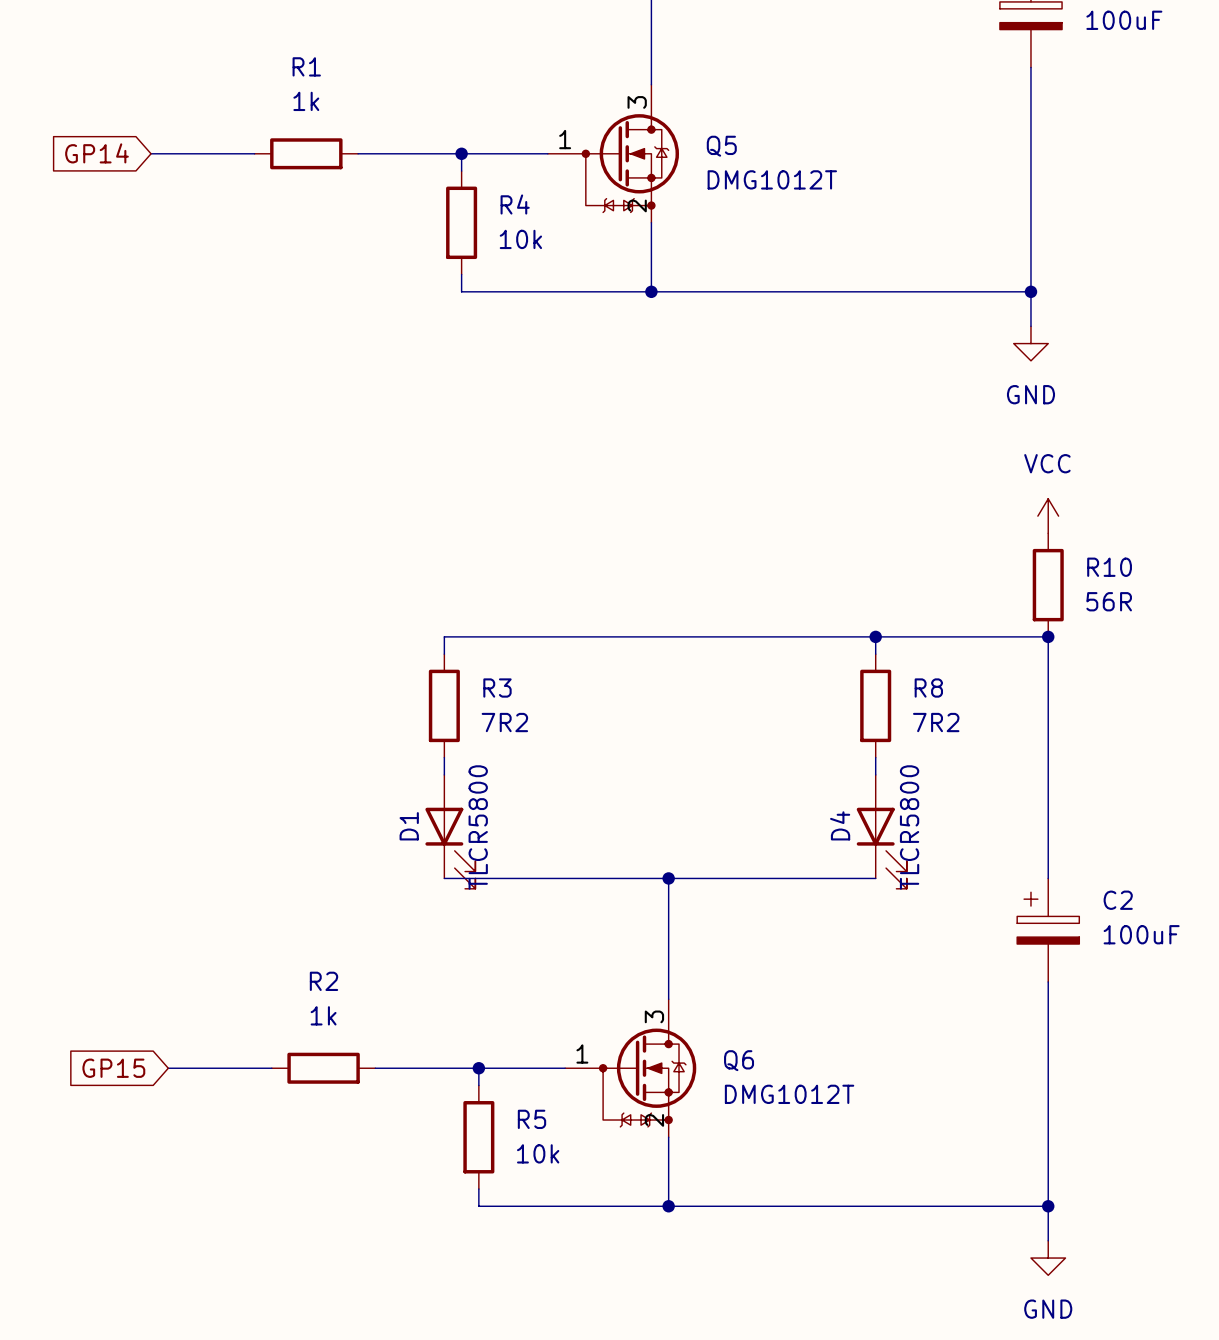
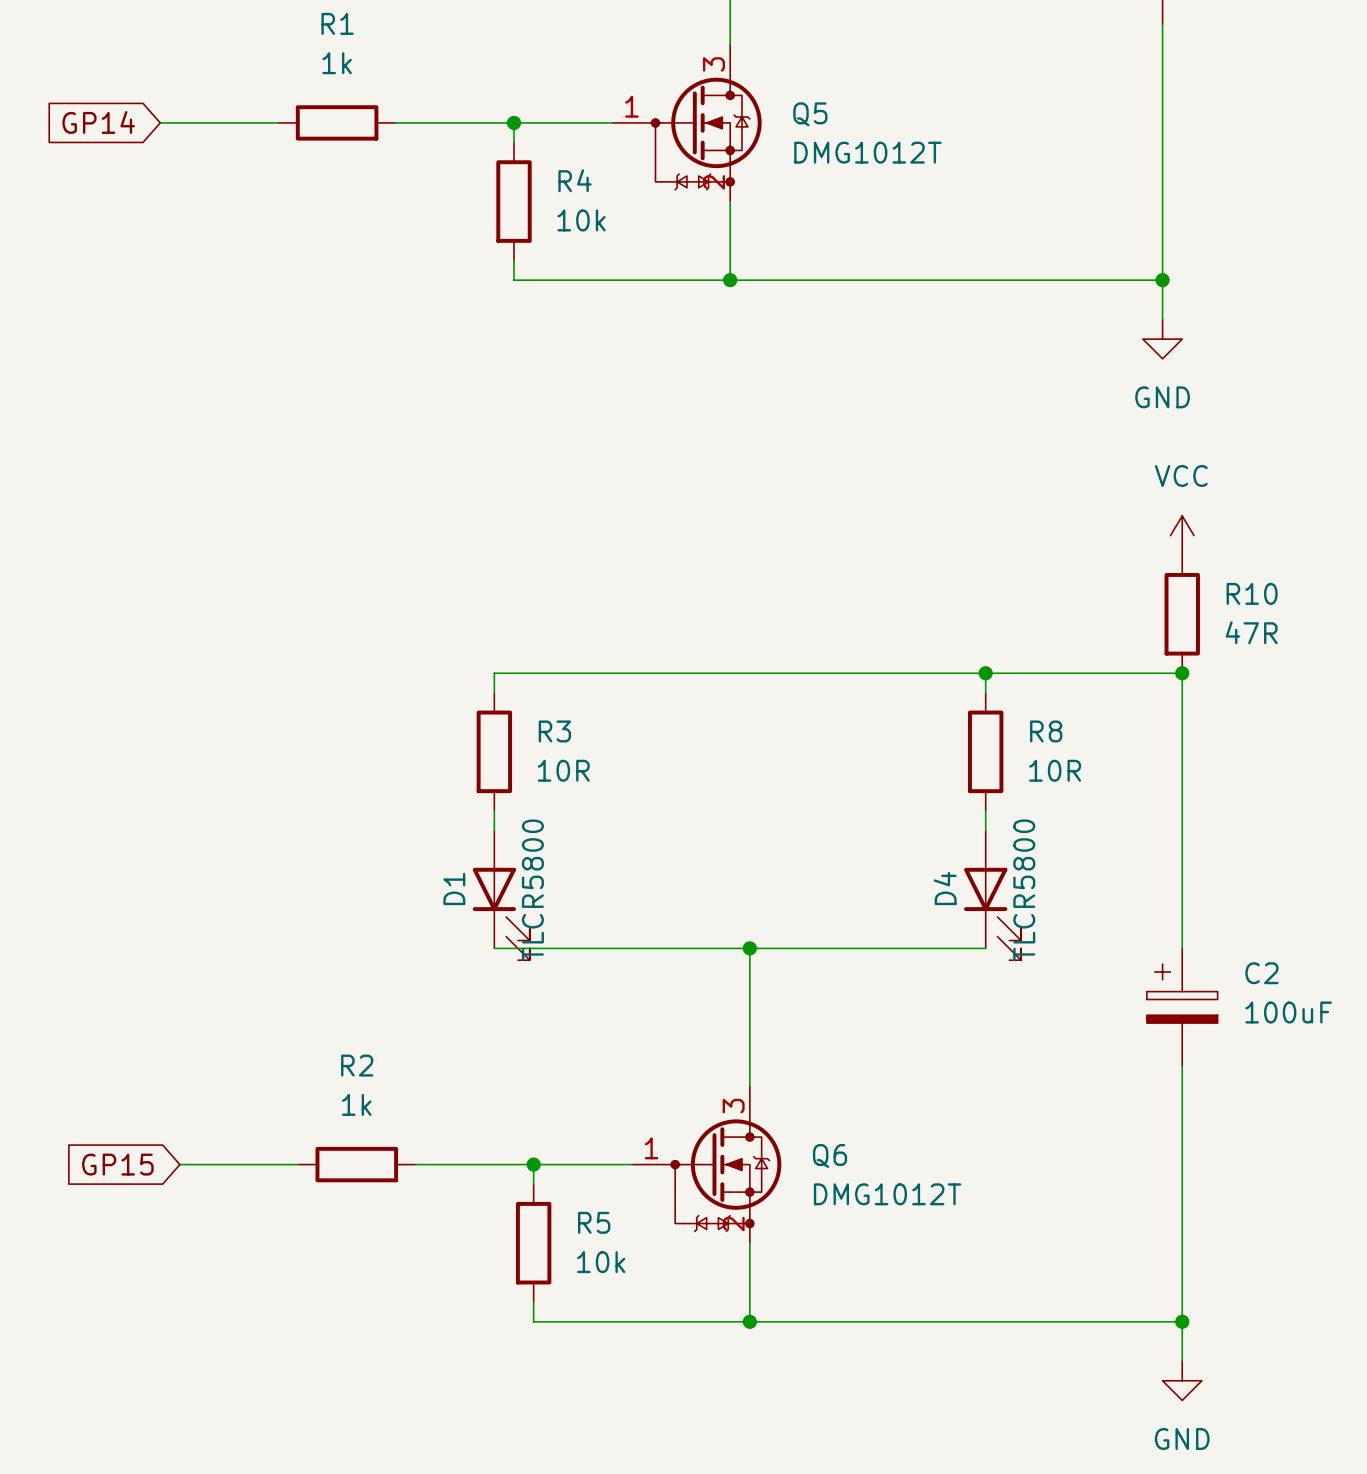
R10 value: 56R (1109, 601) -> 47R (1251, 632)
R3 value: 7R2 (504, 722) -> 10R (563, 770)
R8 value: 7R2 (936, 722) -> 10R (1055, 770)

